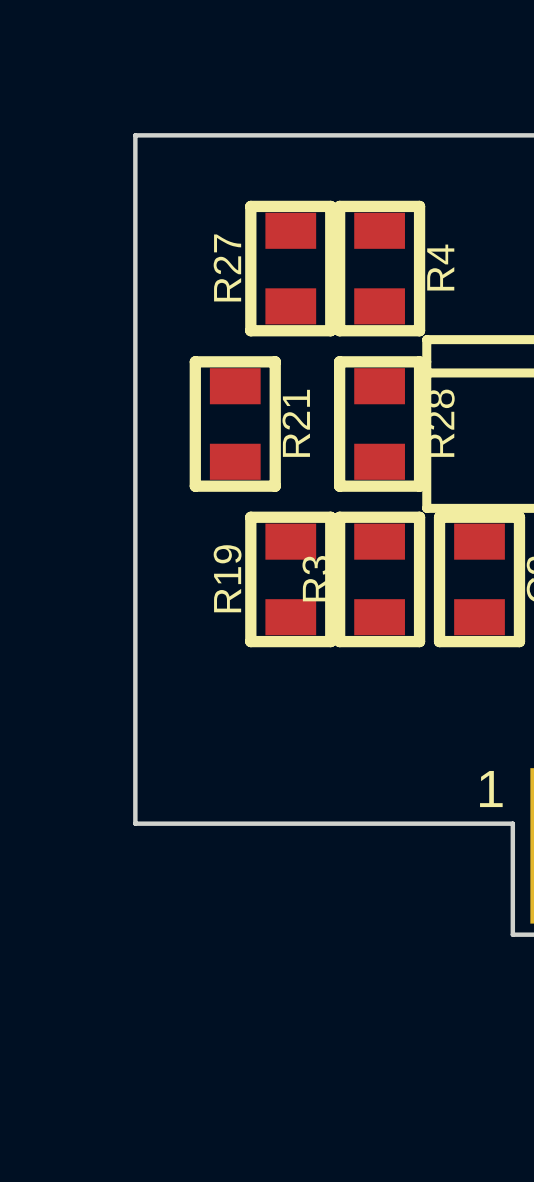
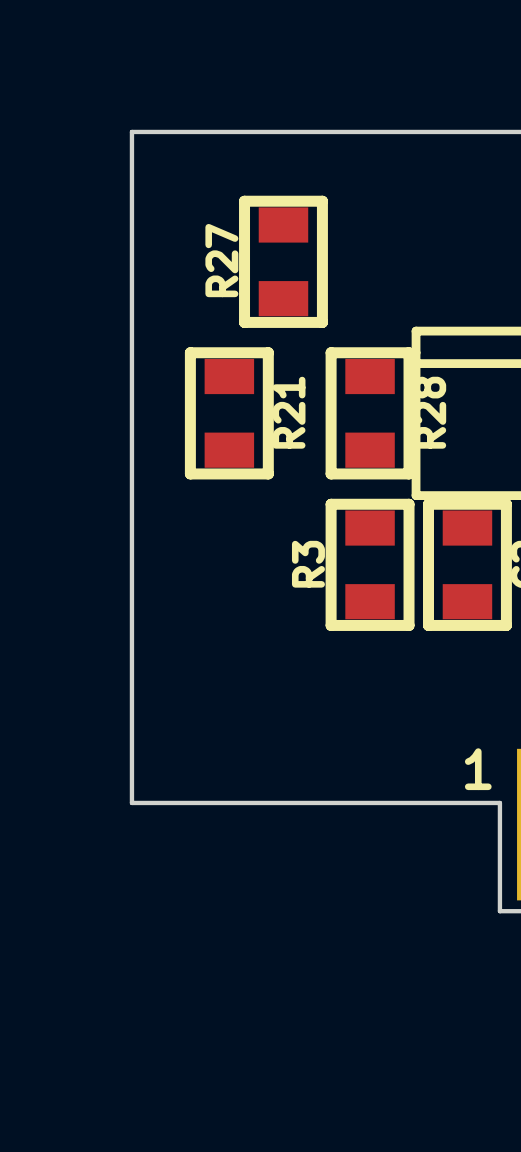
R4: (379, 268) -> none
R19: (290, 579) -> none

